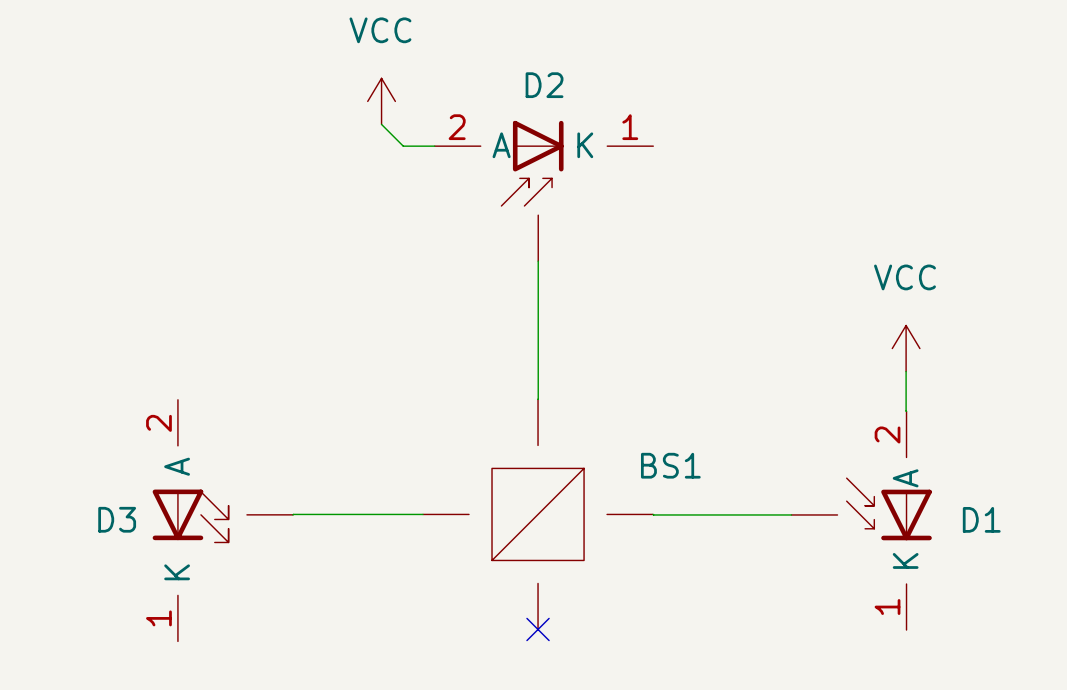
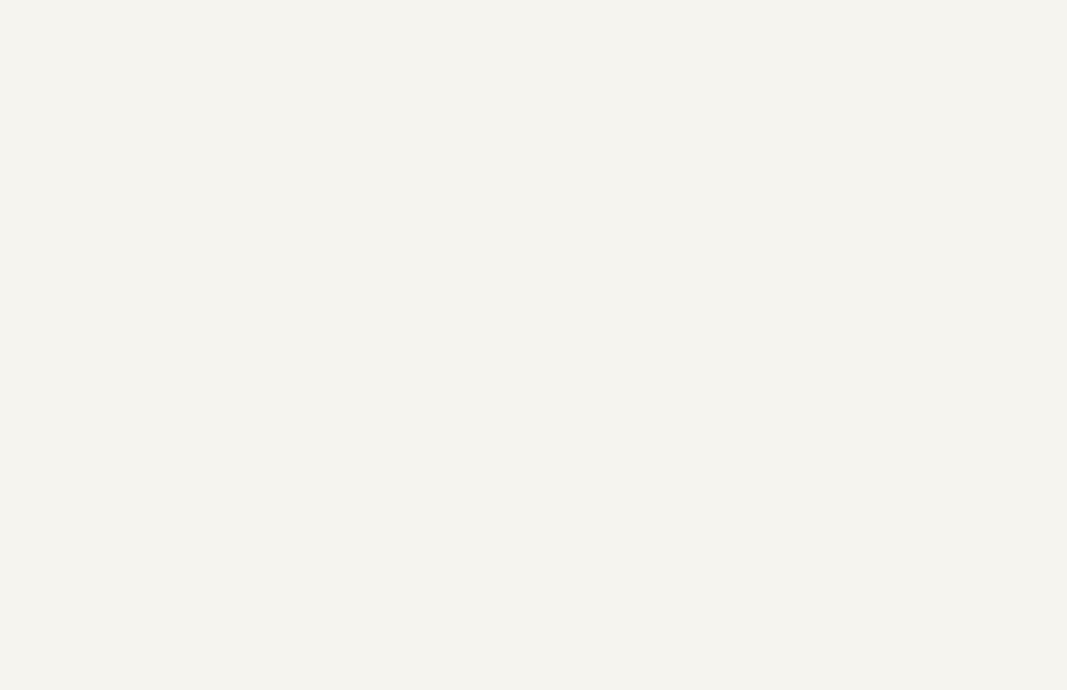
power symbol: VCC (381, 101) -> none
wire: (381, 124) (403, 146) (434, 146) -> none
D2: (543, 191) -> none
wire: (538, 261) (538, 399) -> none
power symbol: VCC (906, 348) -> none
wire: (906, 371) (906, 411) -> none
wire: (422, 514) (292, 514) -> none
BS1: (538, 514) -> none
wire: (653, 514) (791, 514) -> none
D3: (222, 520) -> none
D1: (861, 520) -> none
no-connect mark: (538, 629) -> none

